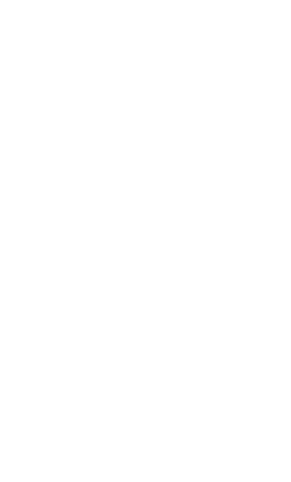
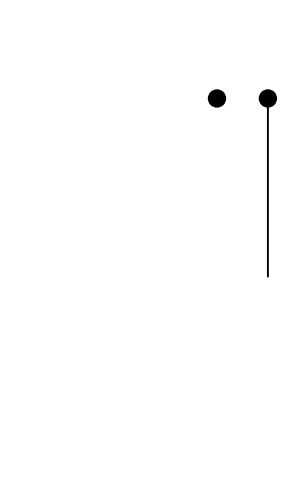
junction: none -> (216, 98)
wire: none -> (267, 98) (267, 276)
junction: none -> (267, 98)

